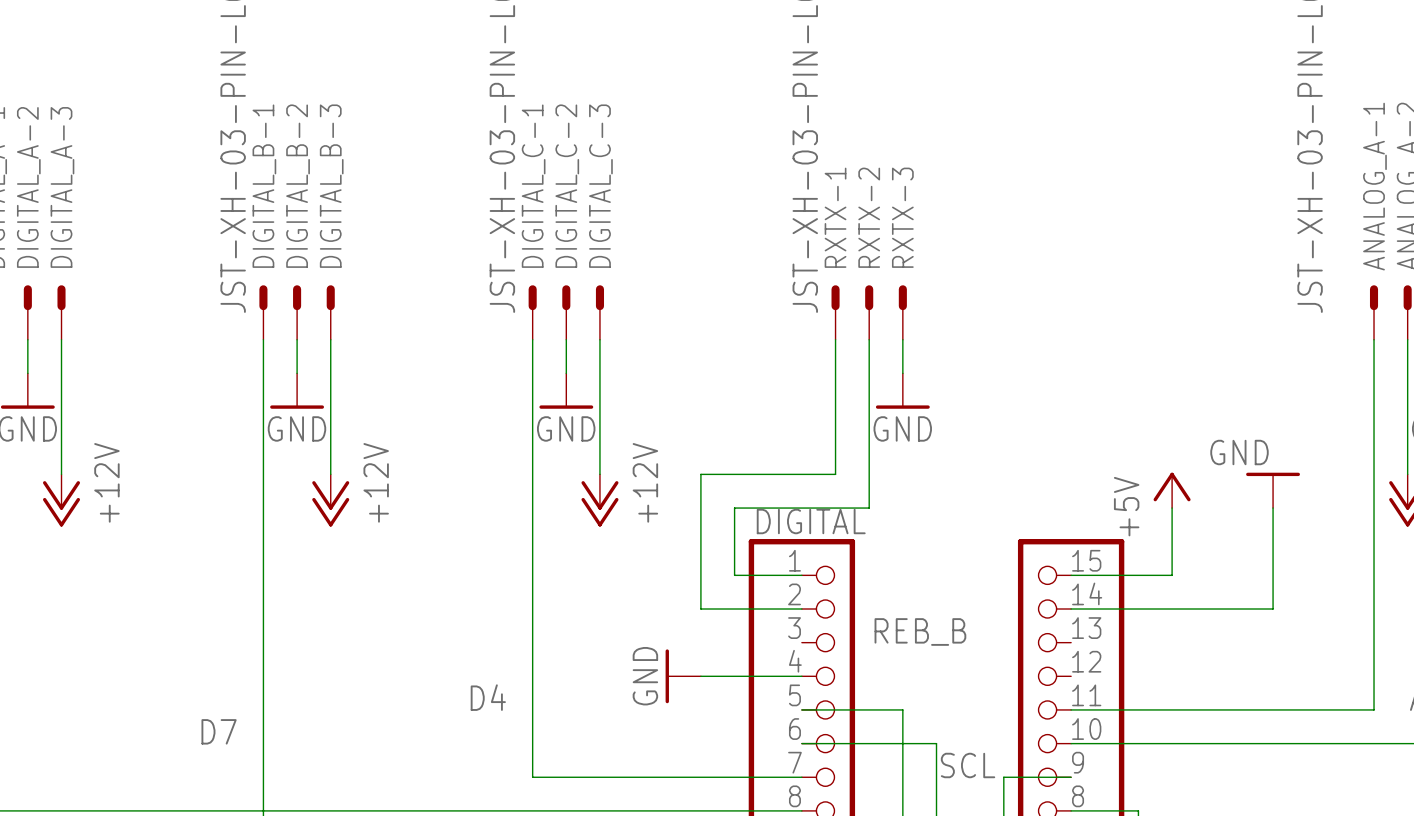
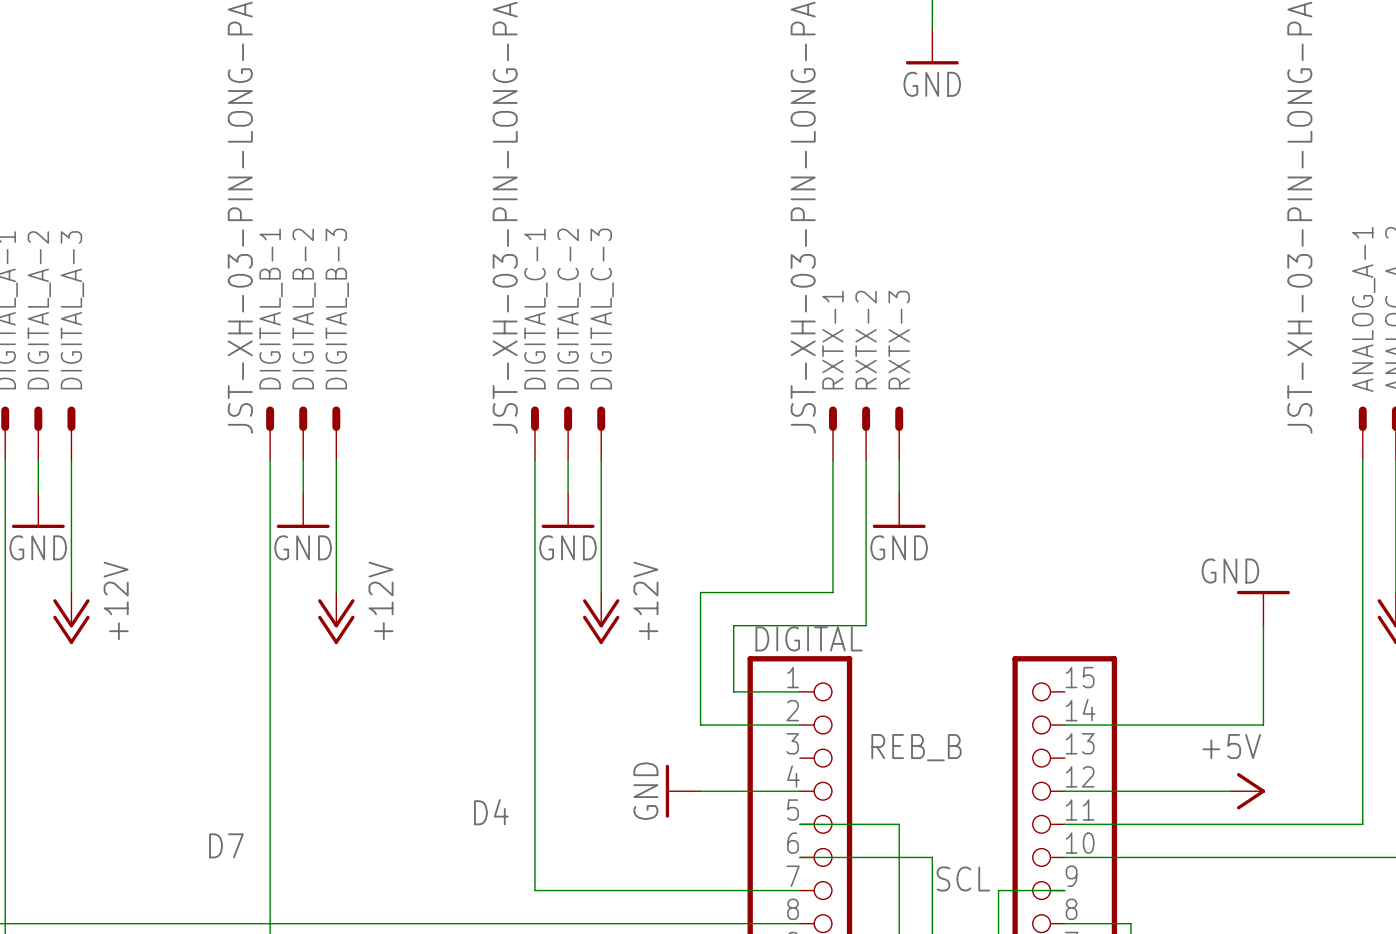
power symbol rotation: 0° (1172, 487) -> 90° clockwise (1251, 791)
power symbol position: +5V (1172, 490) -> +5V (1247, 791)
wire: (1172, 508) (1172, 575) (1071, 575) -> none
wire: none -> (1064, 791) (1230, 791)

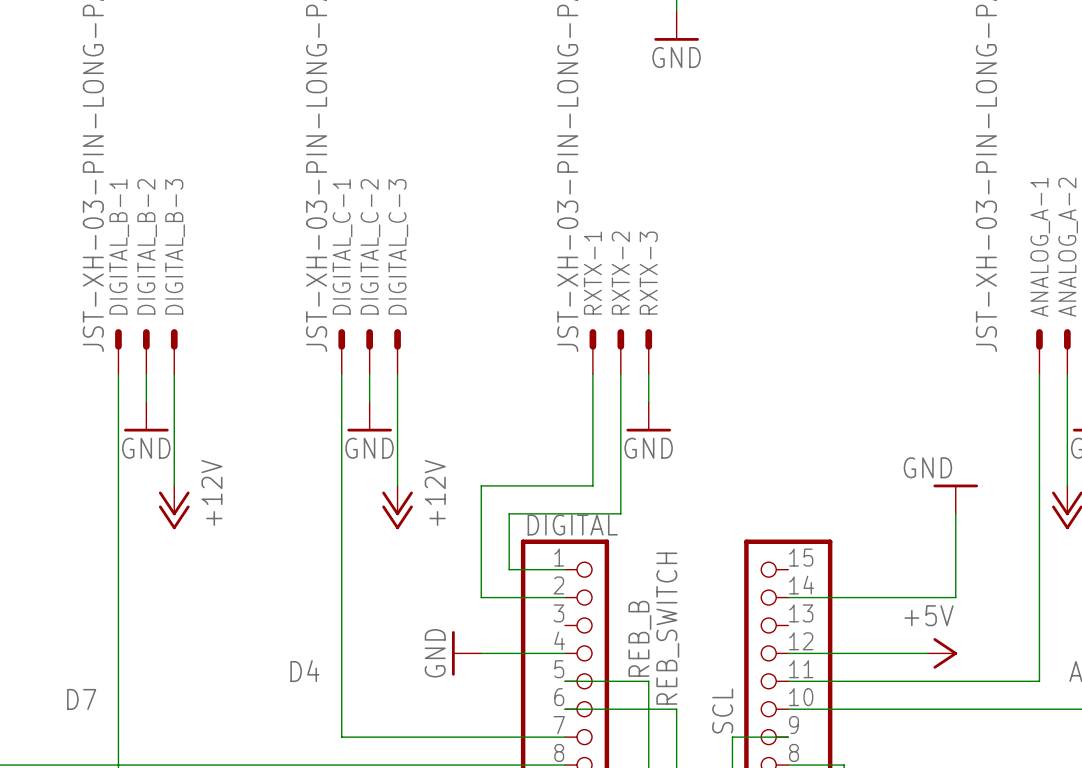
label rotation: 0° (916, 747) -> 90° counterclockwise (639, 638)
label: none -> REB_SWITCH (667, 628)
label rotation: 0° (963, 878) -> 90° counterclockwise (722, 710)

